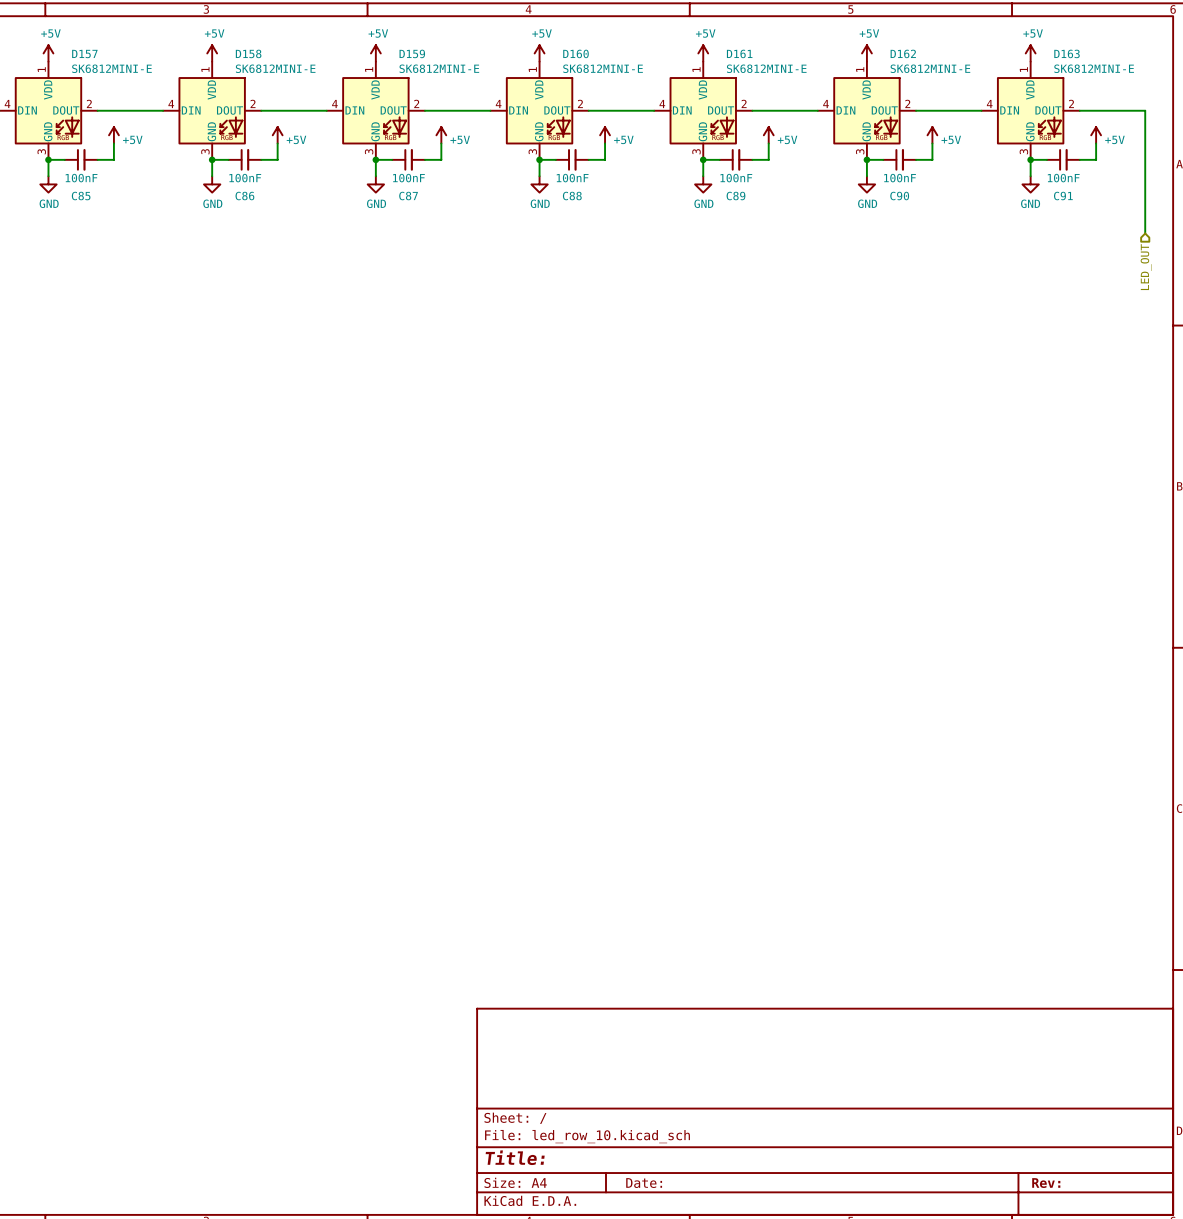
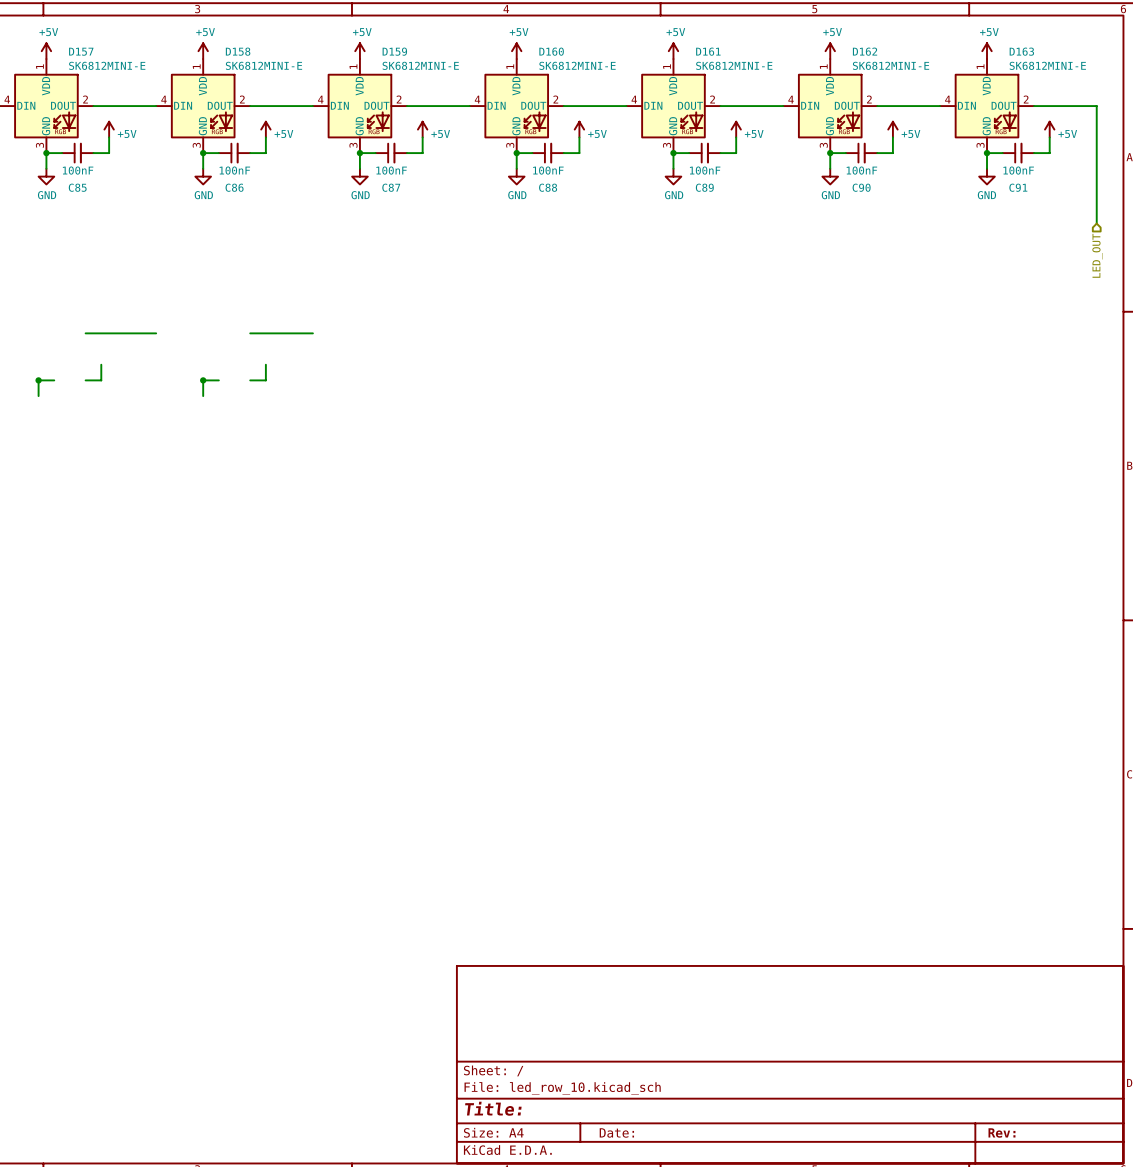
wire: none -> (85, 333) (156, 333)
wire: none -> (250, 333) (312, 333)
wire: none -> (101, 364) (101, 380) (85, 380)
wire: none -> (265, 364) (265, 380) (250, 380)
junction: none -> (38, 380)
wire: none -> (54, 380) (38, 380) (38, 396)
junction: none -> (203, 380)
wire: none -> (218, 380) (203, 380) (203, 396)

